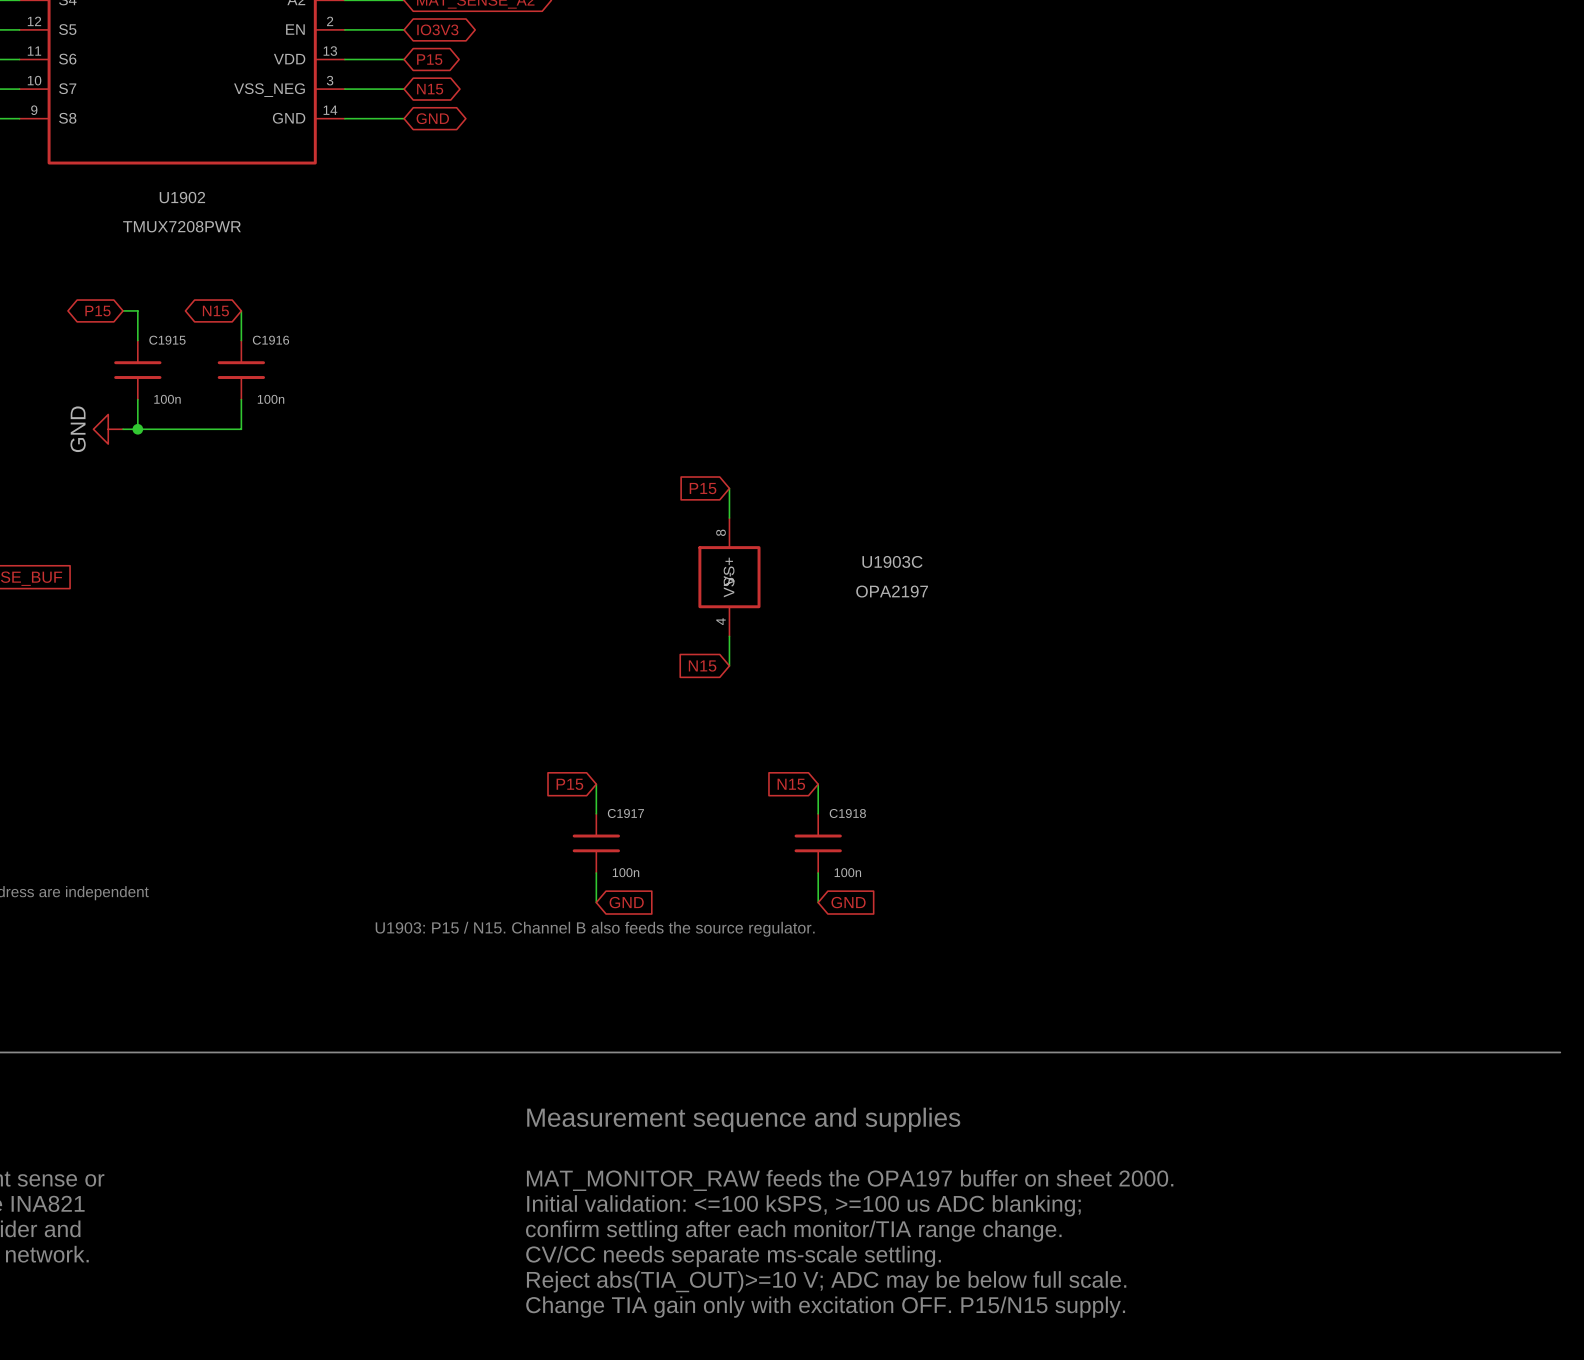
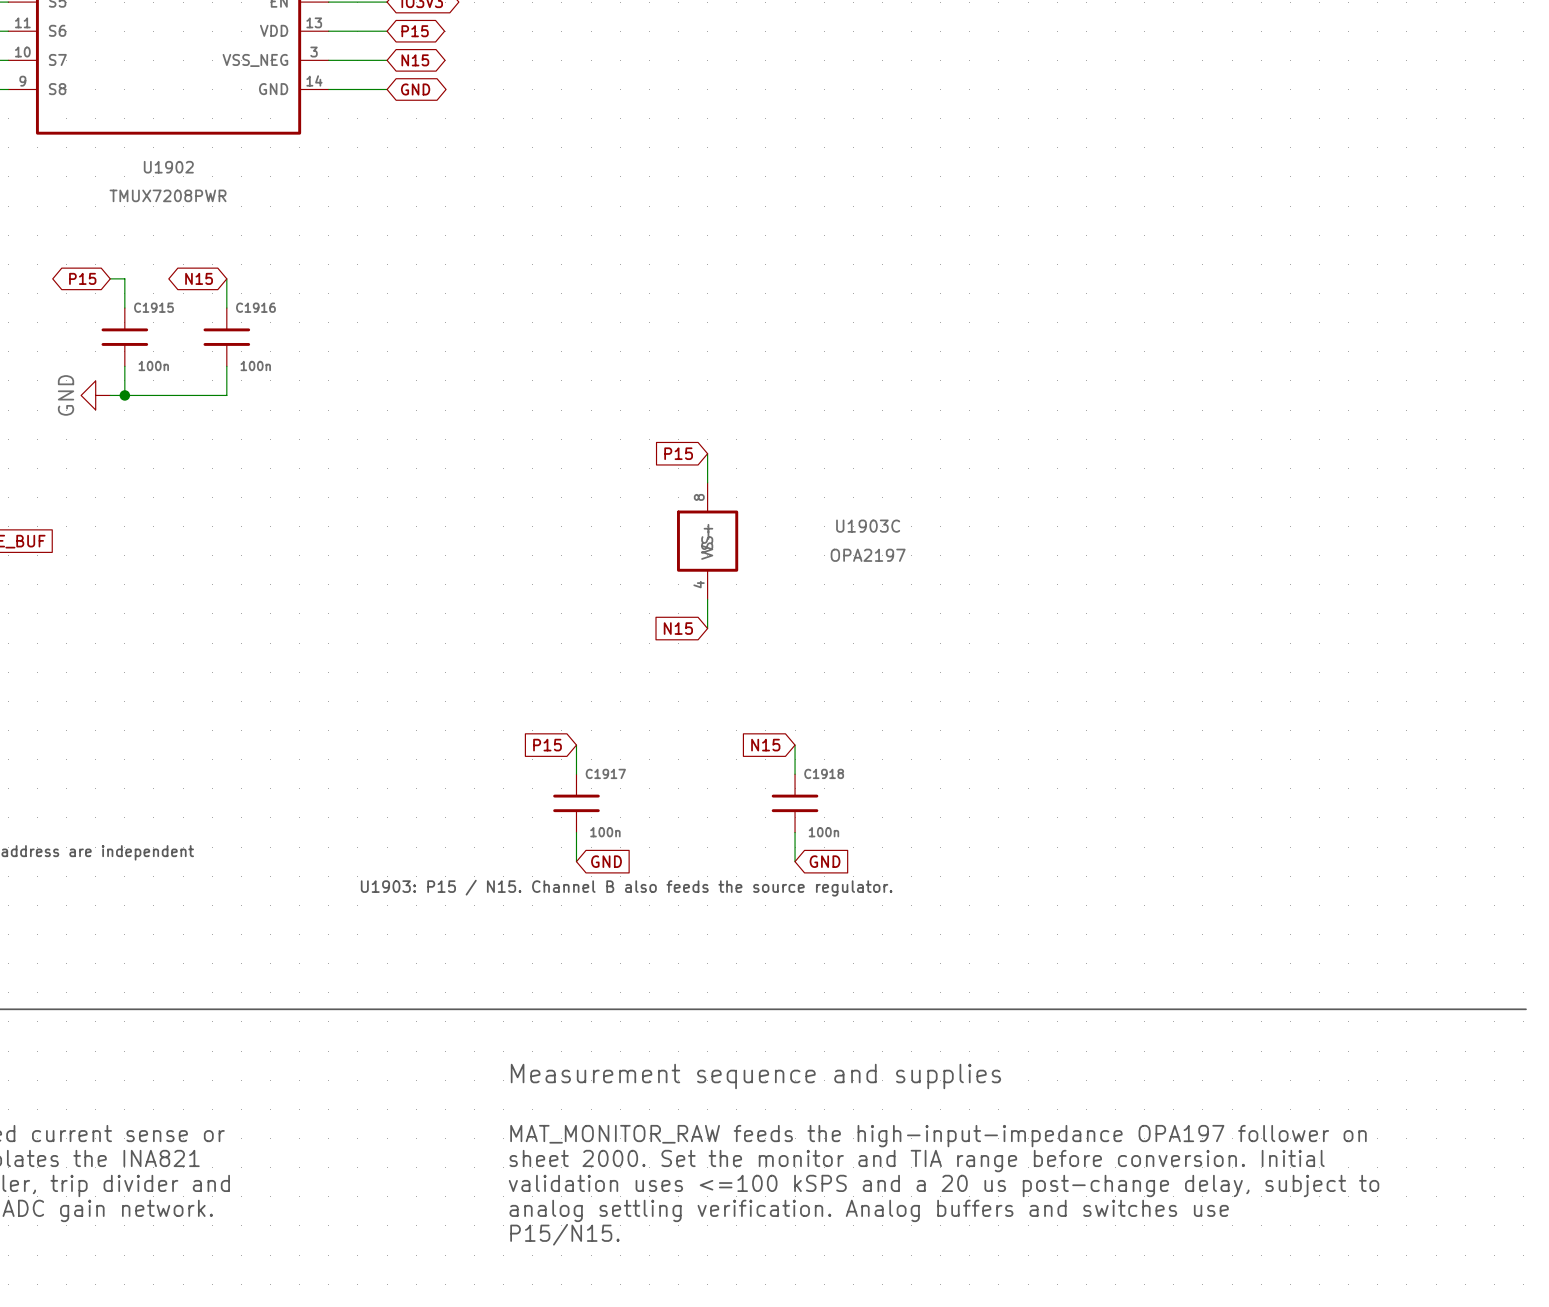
text: MAT_MONITOR_RAW feeds the OPA197 buffer on sheet 2000. (850, 1180) -> MAT_MONITOR_RAW feeds the high-input-impedance OPA197 follower on (938, 1136)
text: Initial validation: <=100 kSPS, >=100 us ADC blanking; (803, 1205) -> sheet 2000. Set the monitor and TIA range before conversion. Initial (917, 1161)
text: confirm settling after each monitor/TIA range change. (793, 1231) -> validation uses <=100 kSPS and a 20 us post-change delay, subject to (944, 1185)
text: CV/CC needs separate ms-scale settling. (733, 1256) -> analog settling verification. Analog buffers and switches use (869, 1210)
text: Reject abs(TIA_OUT)>=10 V; ADC may be below full scale. (826, 1281) -> P15/N15. (564, 1234)
text: Change TIA gain only with excitation OFF. P15/N15 supply. (825, 1307) -> none

